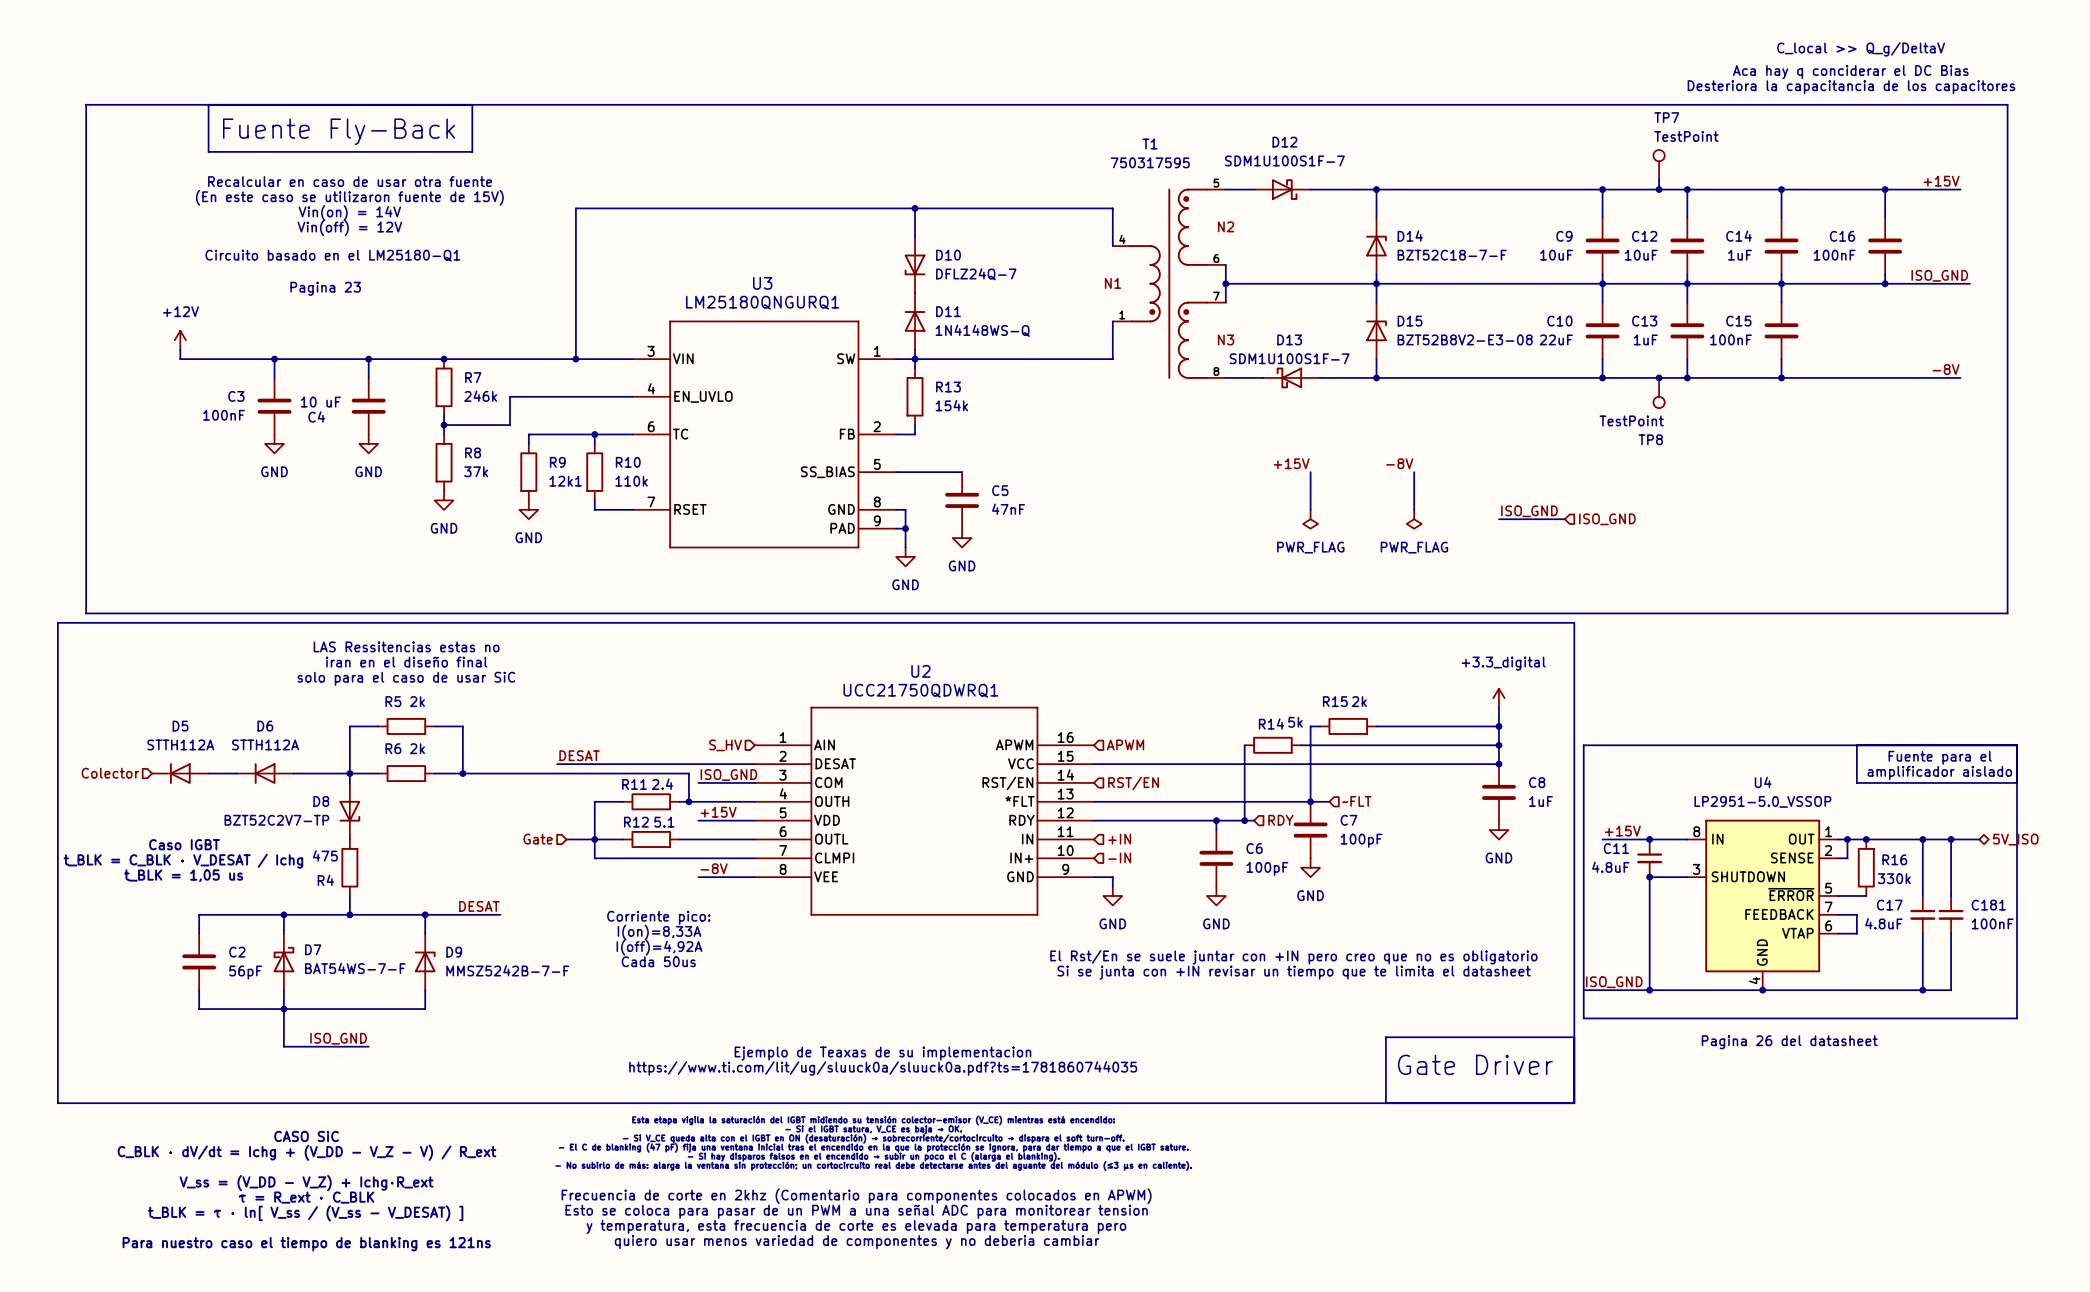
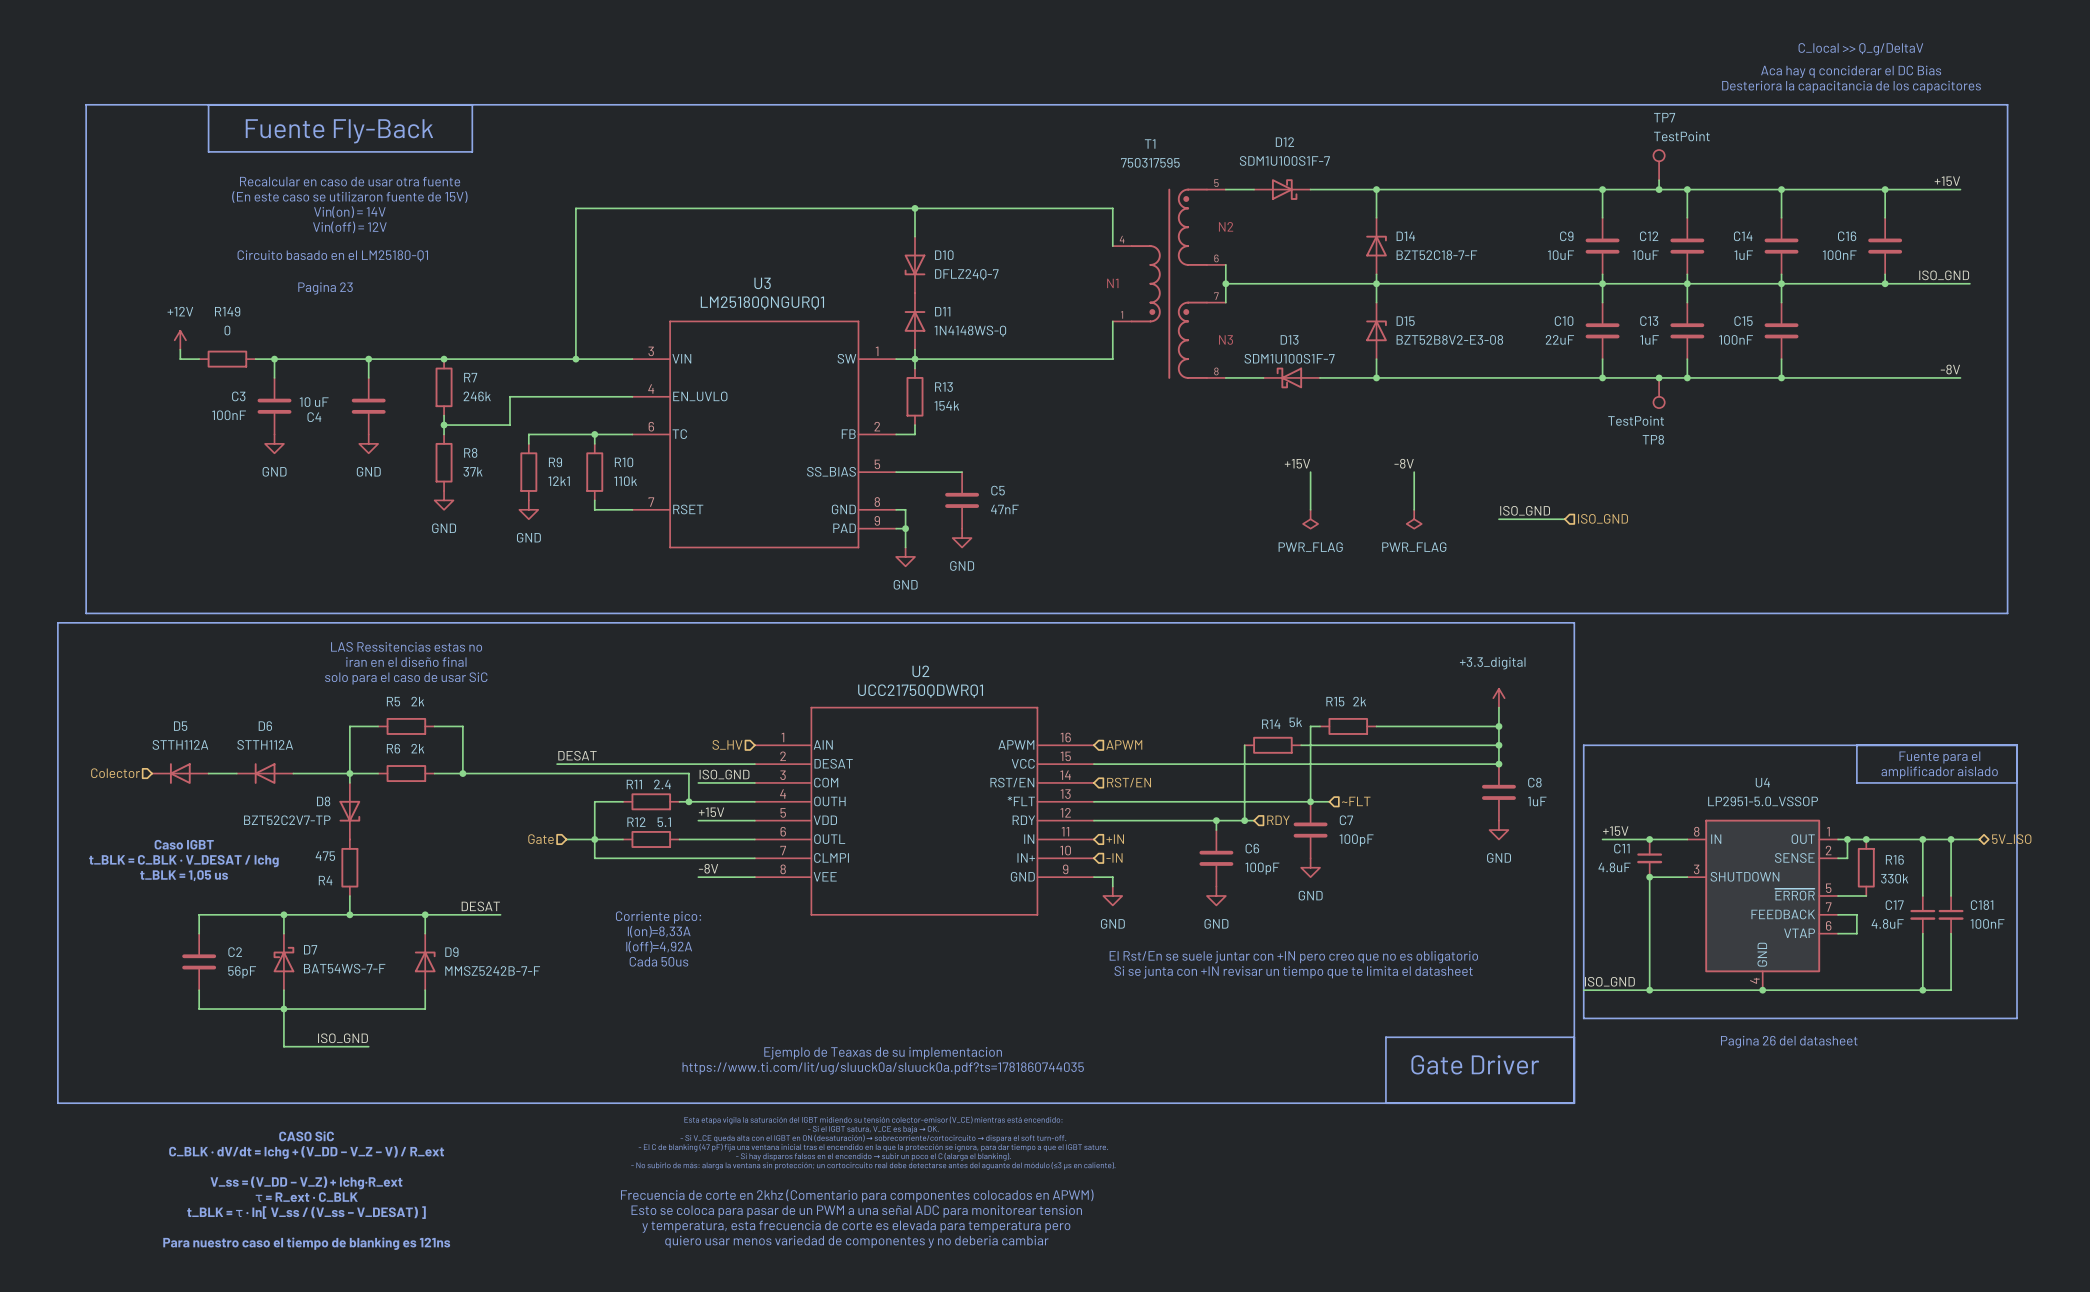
wire: (199, 359) (255, 359) -> none
R149: none -> 0 (227, 359)

